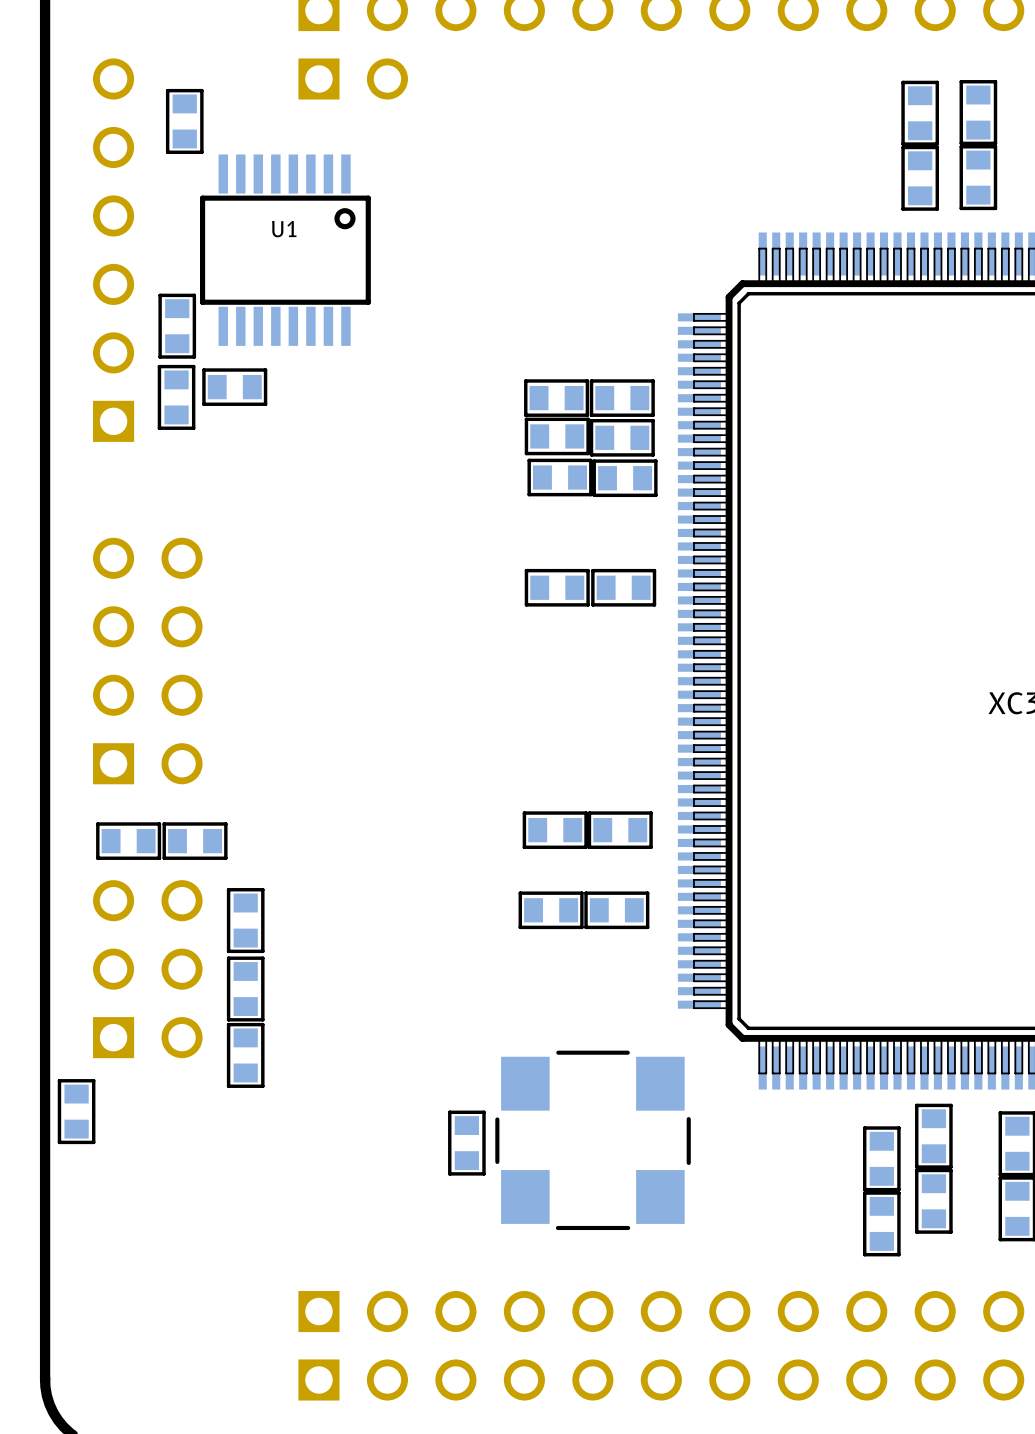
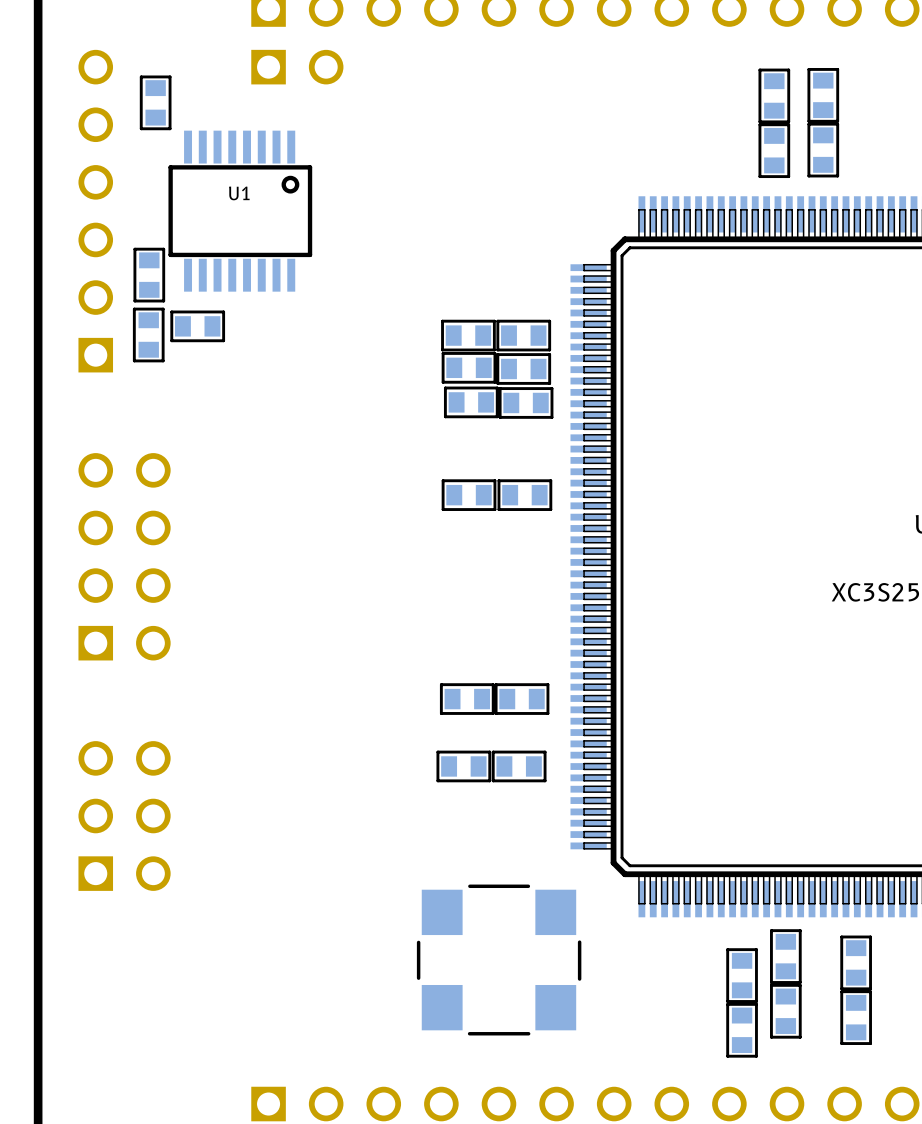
part: (128, 841) -> none
part: (195, 841) -> none
part: (245, 920) -> none
part: (245, 989) -> none
part: (245, 1055) -> none
part: (76, 1111) -> none
part: (466, 1143) -> none

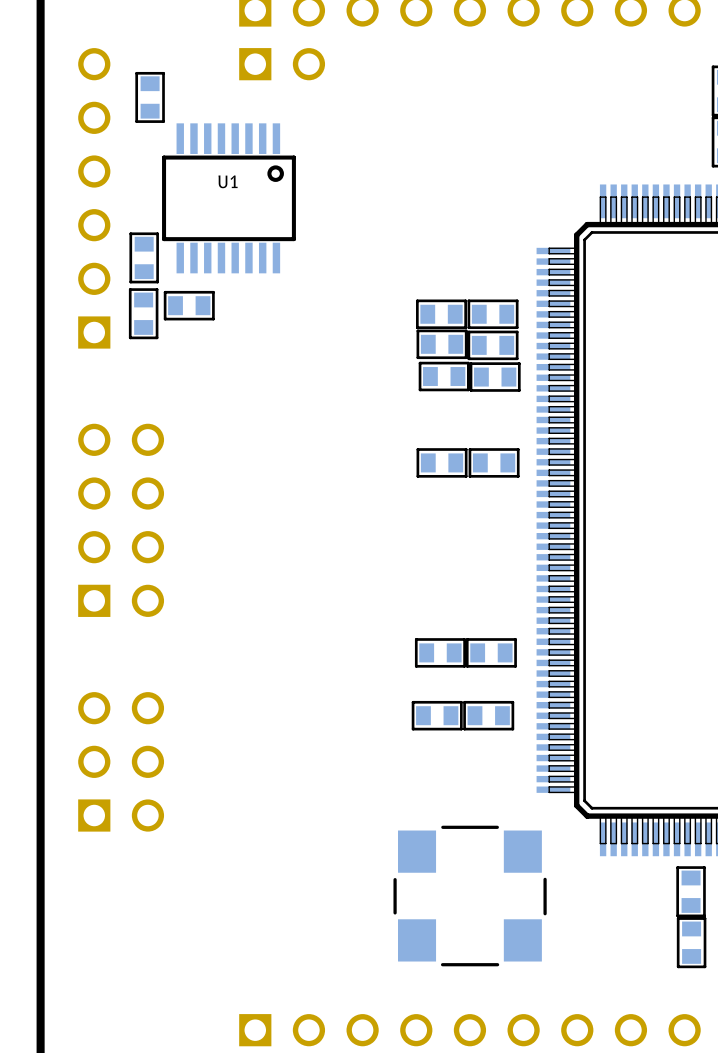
part: none -> (691, 891)
part: (742, 975) -> none
part: none -> (691, 942)
part: (742, 1030) -> none

